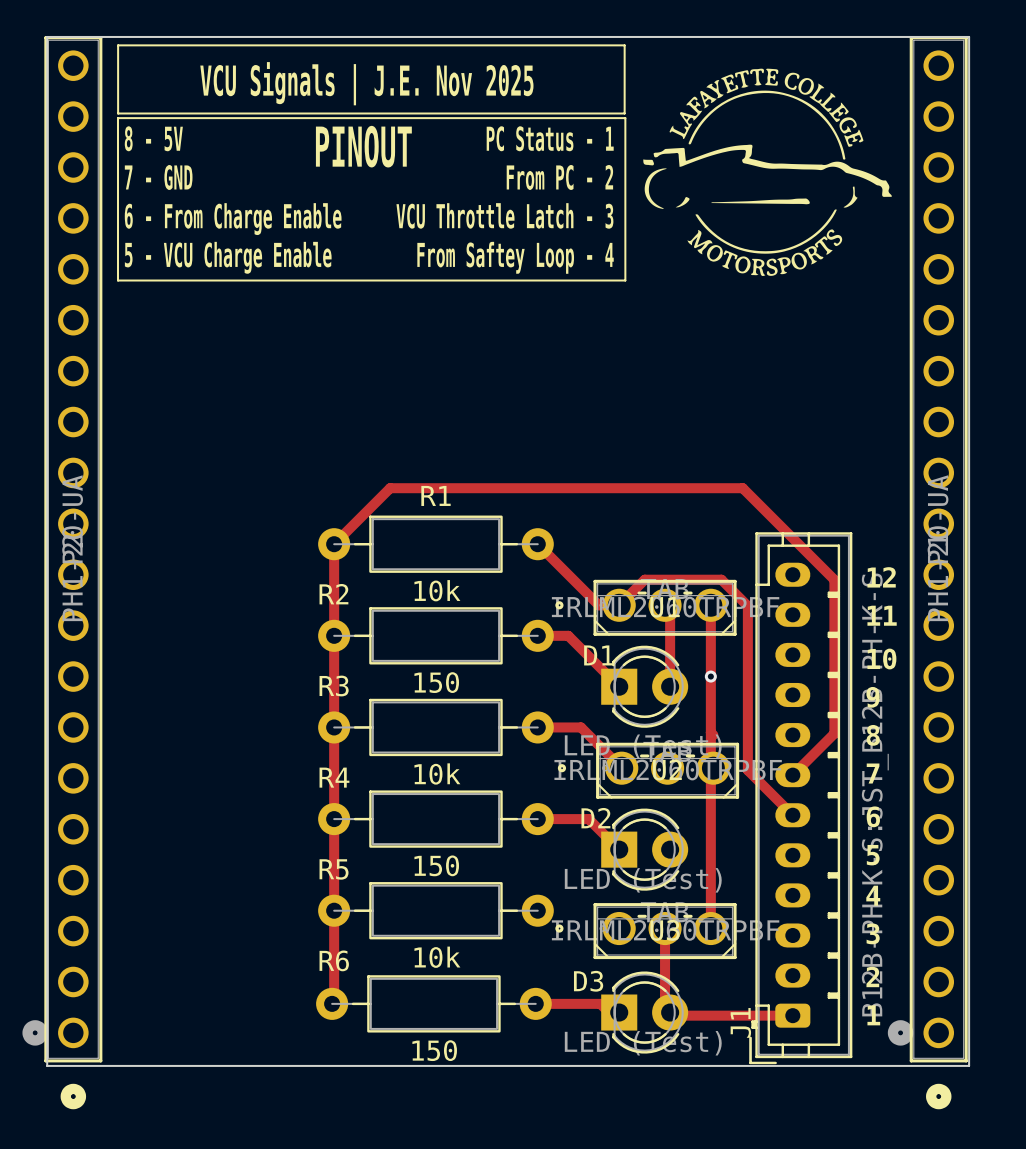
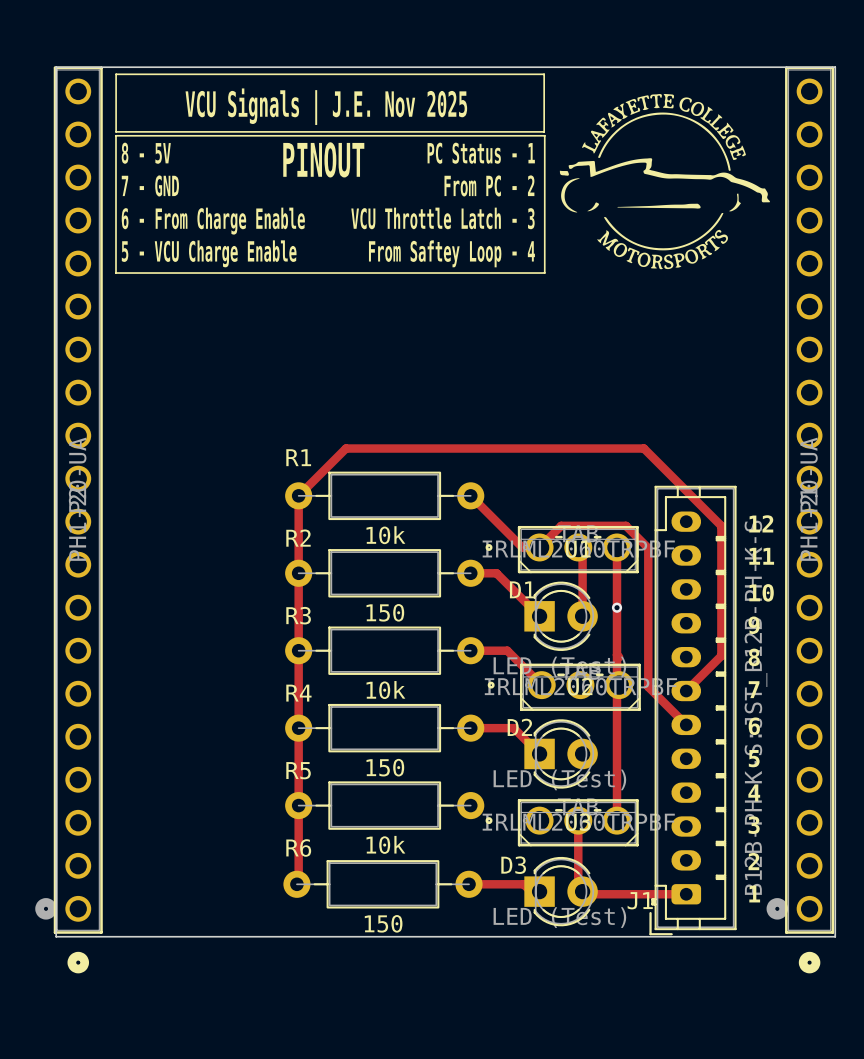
R1 name position: R1 (435, 495) -> R1 (298, 457)
J1 name rotation: 0° (740, 1022) -> 90° clockwise (640, 900)

